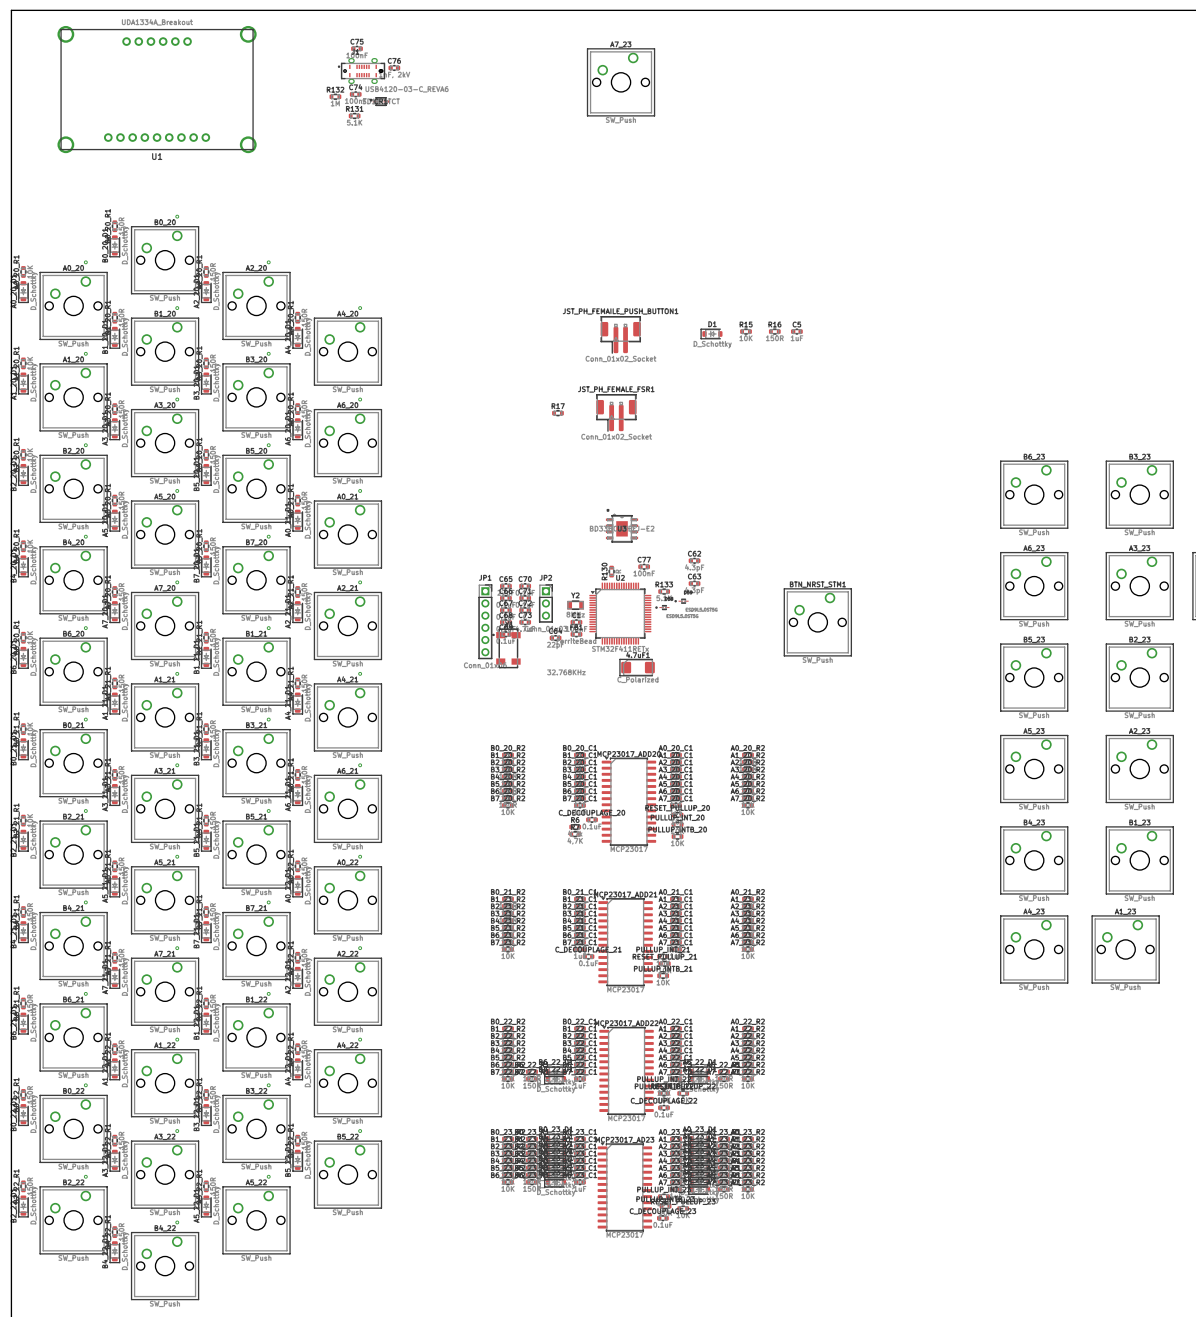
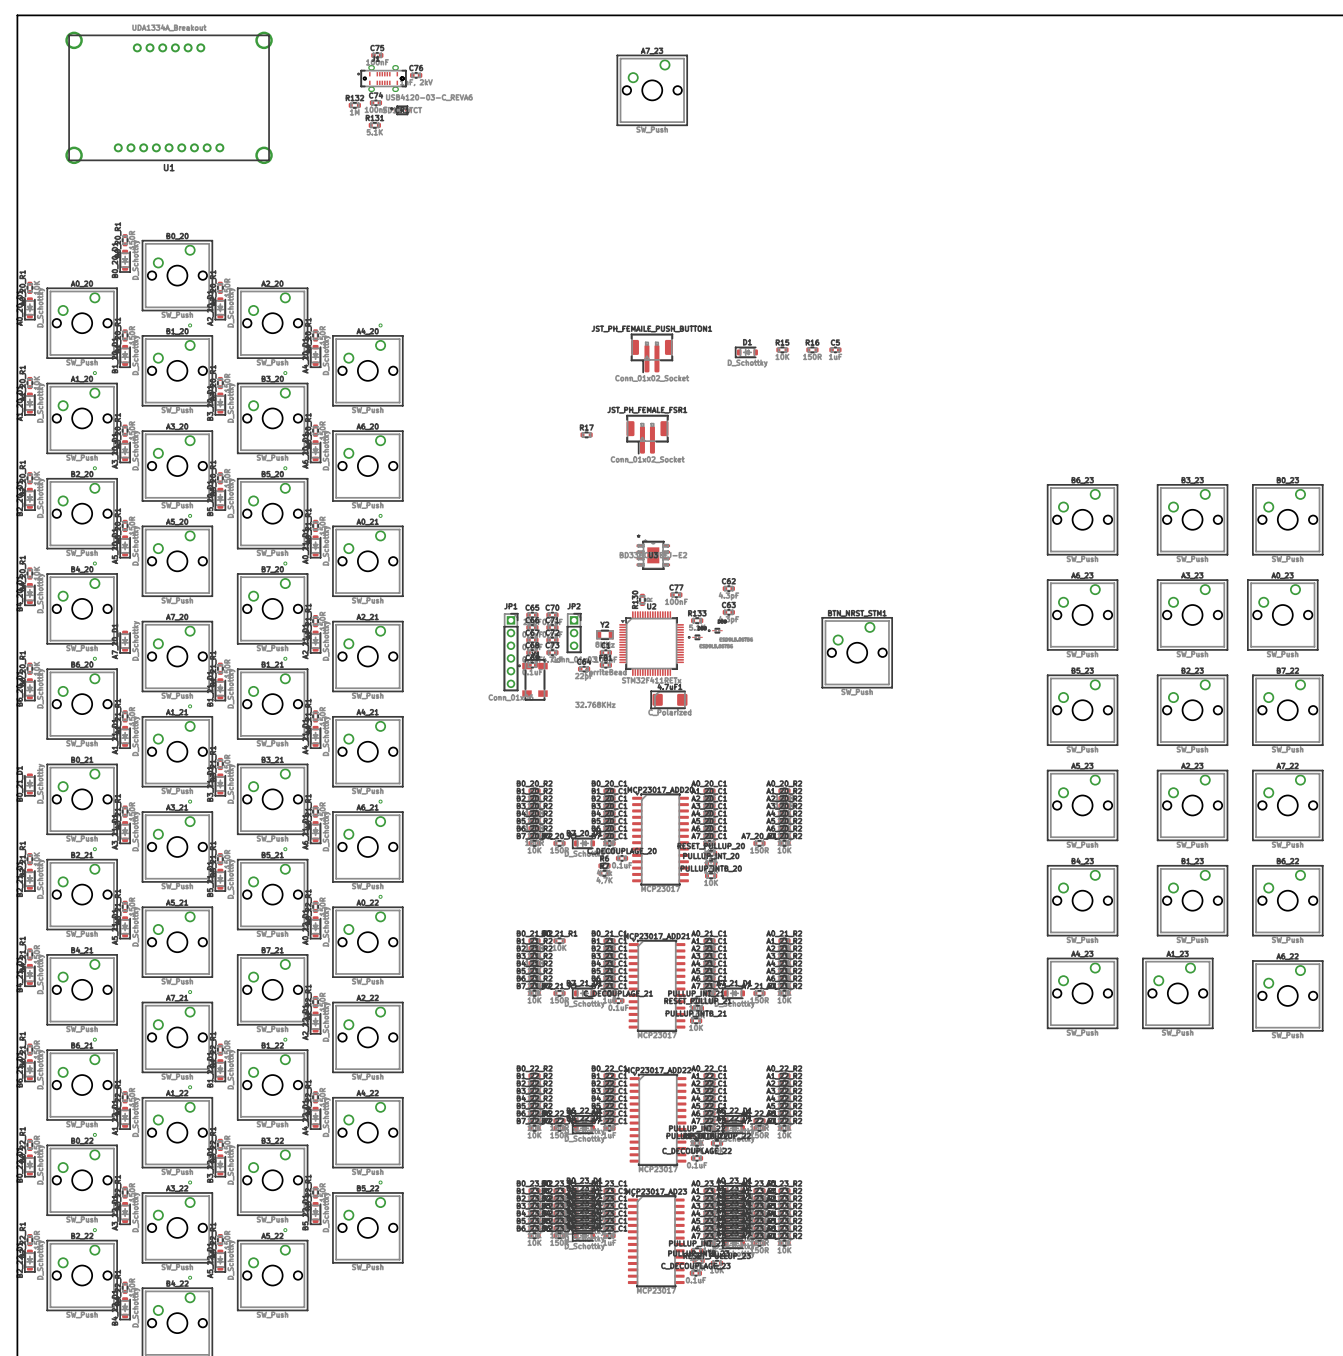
via: (177, 216) -> none
via: (85, 262) -> none
via: (268, 262) -> none
via: (177, 399) -> none
via: (360, 399) -> none
part rotation: 0° (206, 546) -> 90° clockwise (559, 843)
part position: (206, 546) -> (559, 843)
part rotation: 0° (206, 566) -> 90° clockwise (583, 843)
part position: (206, 566) -> (583, 843)
via: (177, 582) -> none
via: (360, 582) -> none
part rotation: 0° (114, 592) -> 90° clockwise (759, 843)
part position: (114, 592) -> (759, 843)
via: (360, 673) -> none
via: (85, 719) -> none
via: (268, 719) -> none
part rotation: 0° (23, 729) -> 90° clockwise (559, 940)
part position: (23, 729) -> (559, 940)
via: (177, 856) -> none
via: (85, 902) -> none
via: (268, 902) -> none
part rotation: 0° (206, 912) -> 90° clockwise (559, 993)
part position: (206, 912) -> (559, 993)
part rotation: 0° (206, 932) -> 90° clockwise (583, 993)
part position: (206, 932) -> (583, 993)
via: (360, 948) -> none
part rotation: 0° (114, 957) -> 90° clockwise (759, 993)
part position: (114, 957) -> (759, 993)
part rotation: 0° (114, 977) -> 90° clockwise (733, 993)
part position: (114, 977) -> (733, 993)
via: (360, 1039) -> none
via: (268, 1085) -> none

